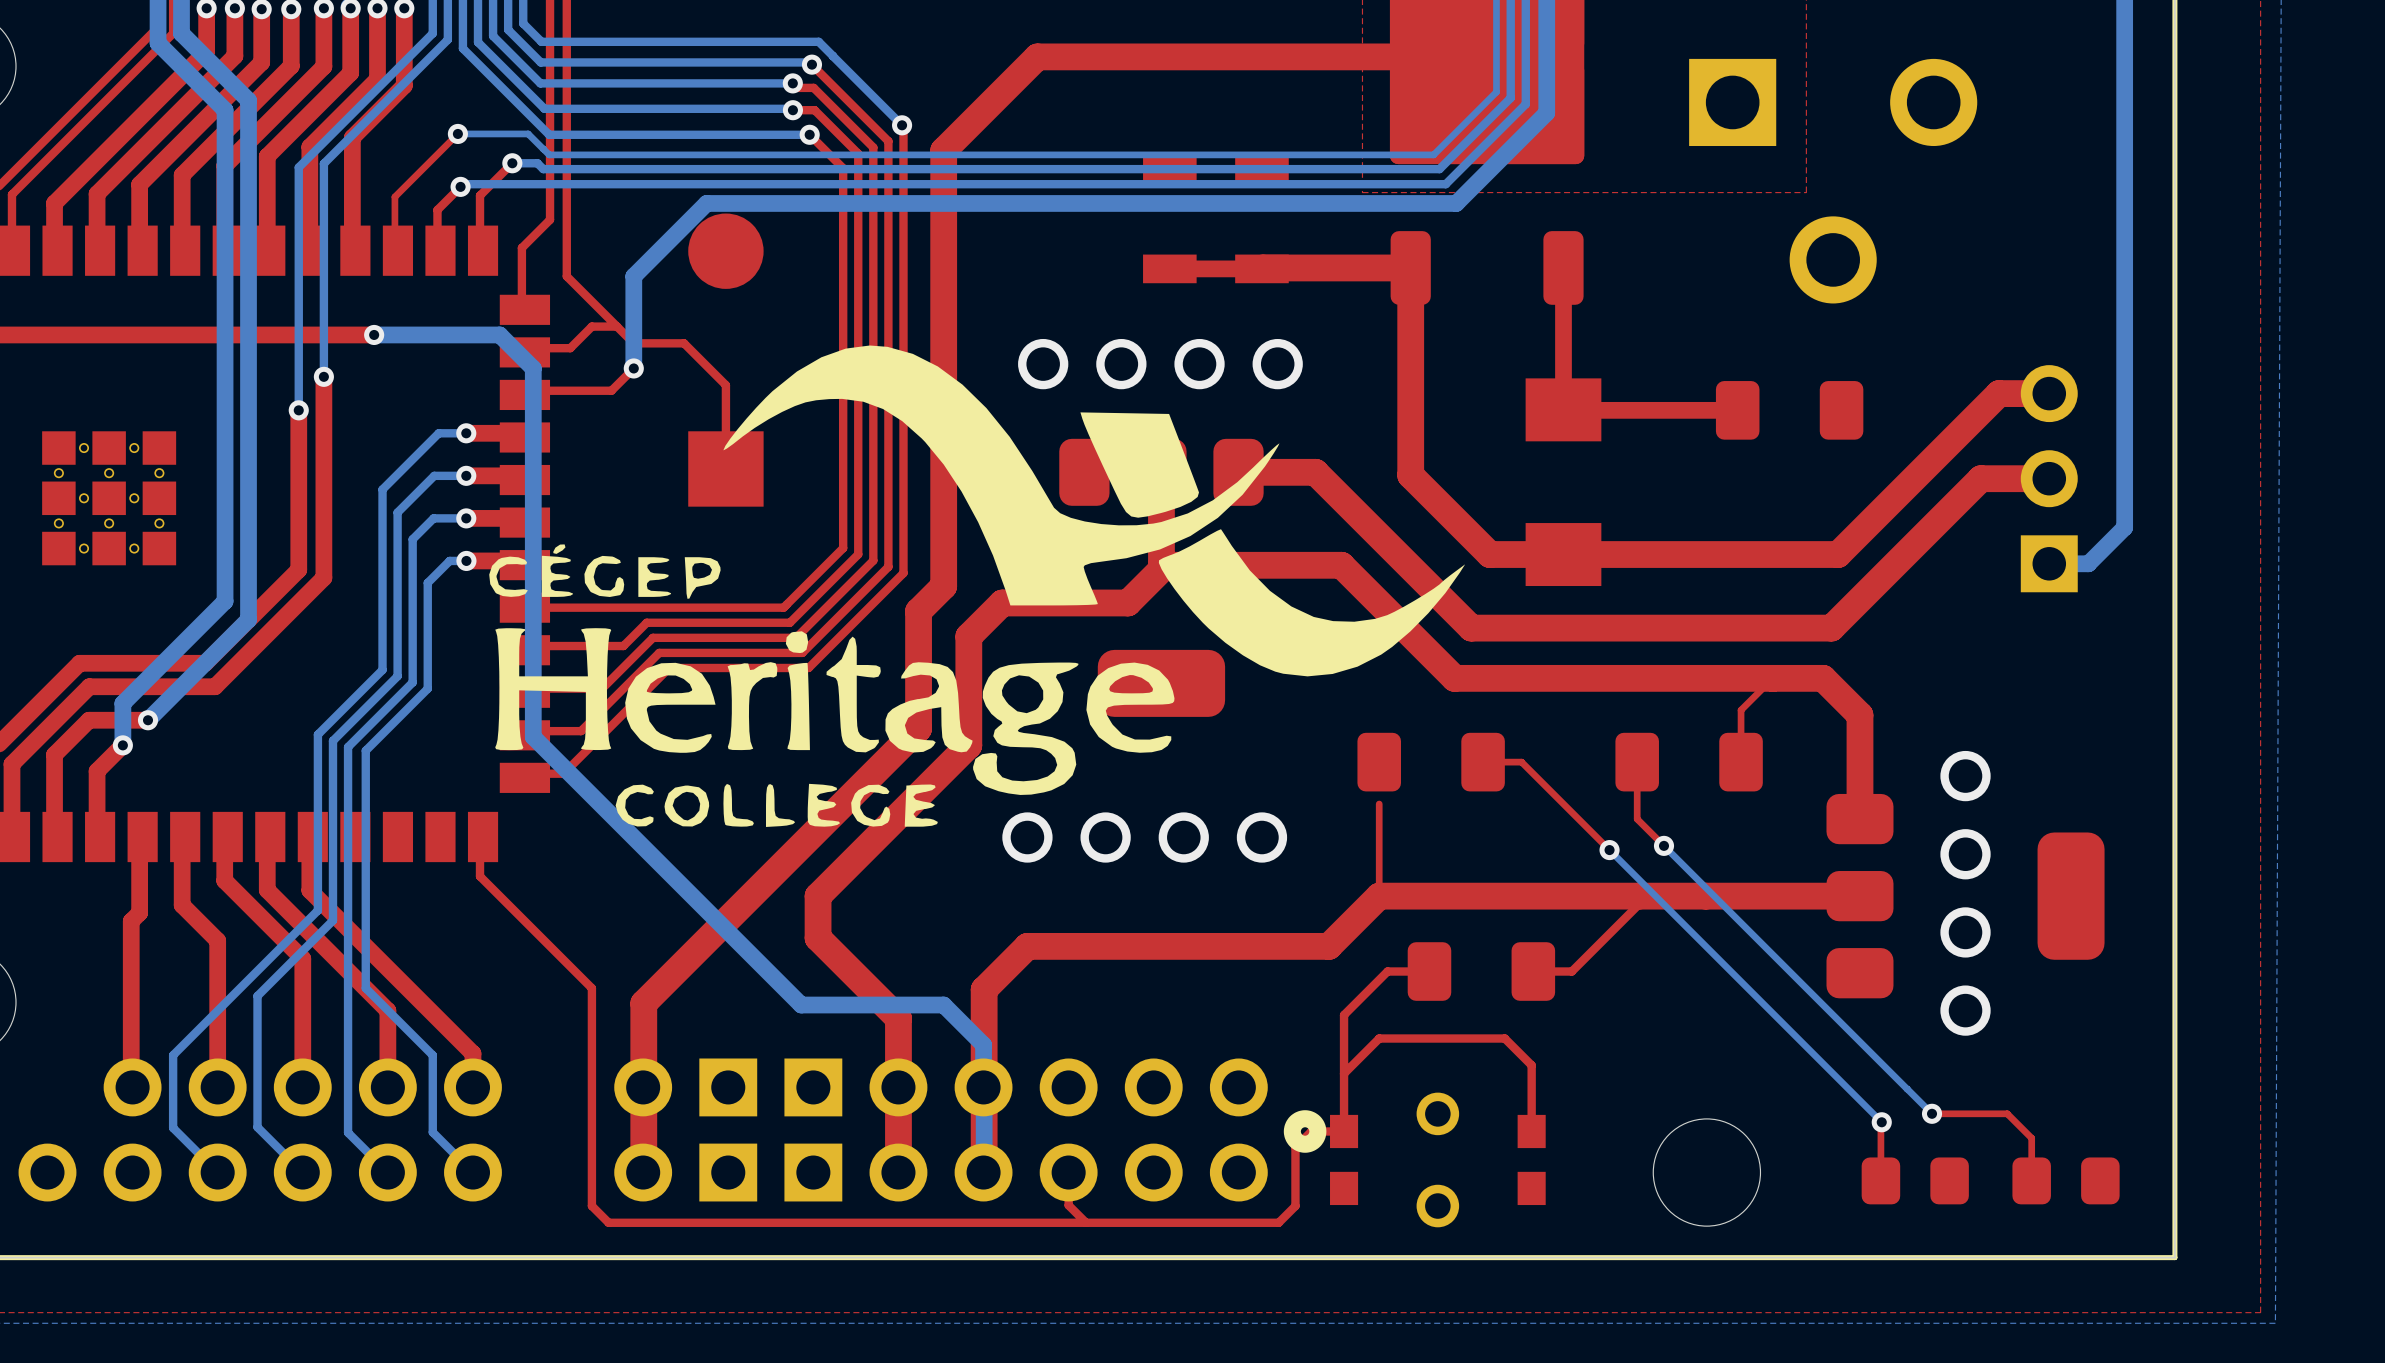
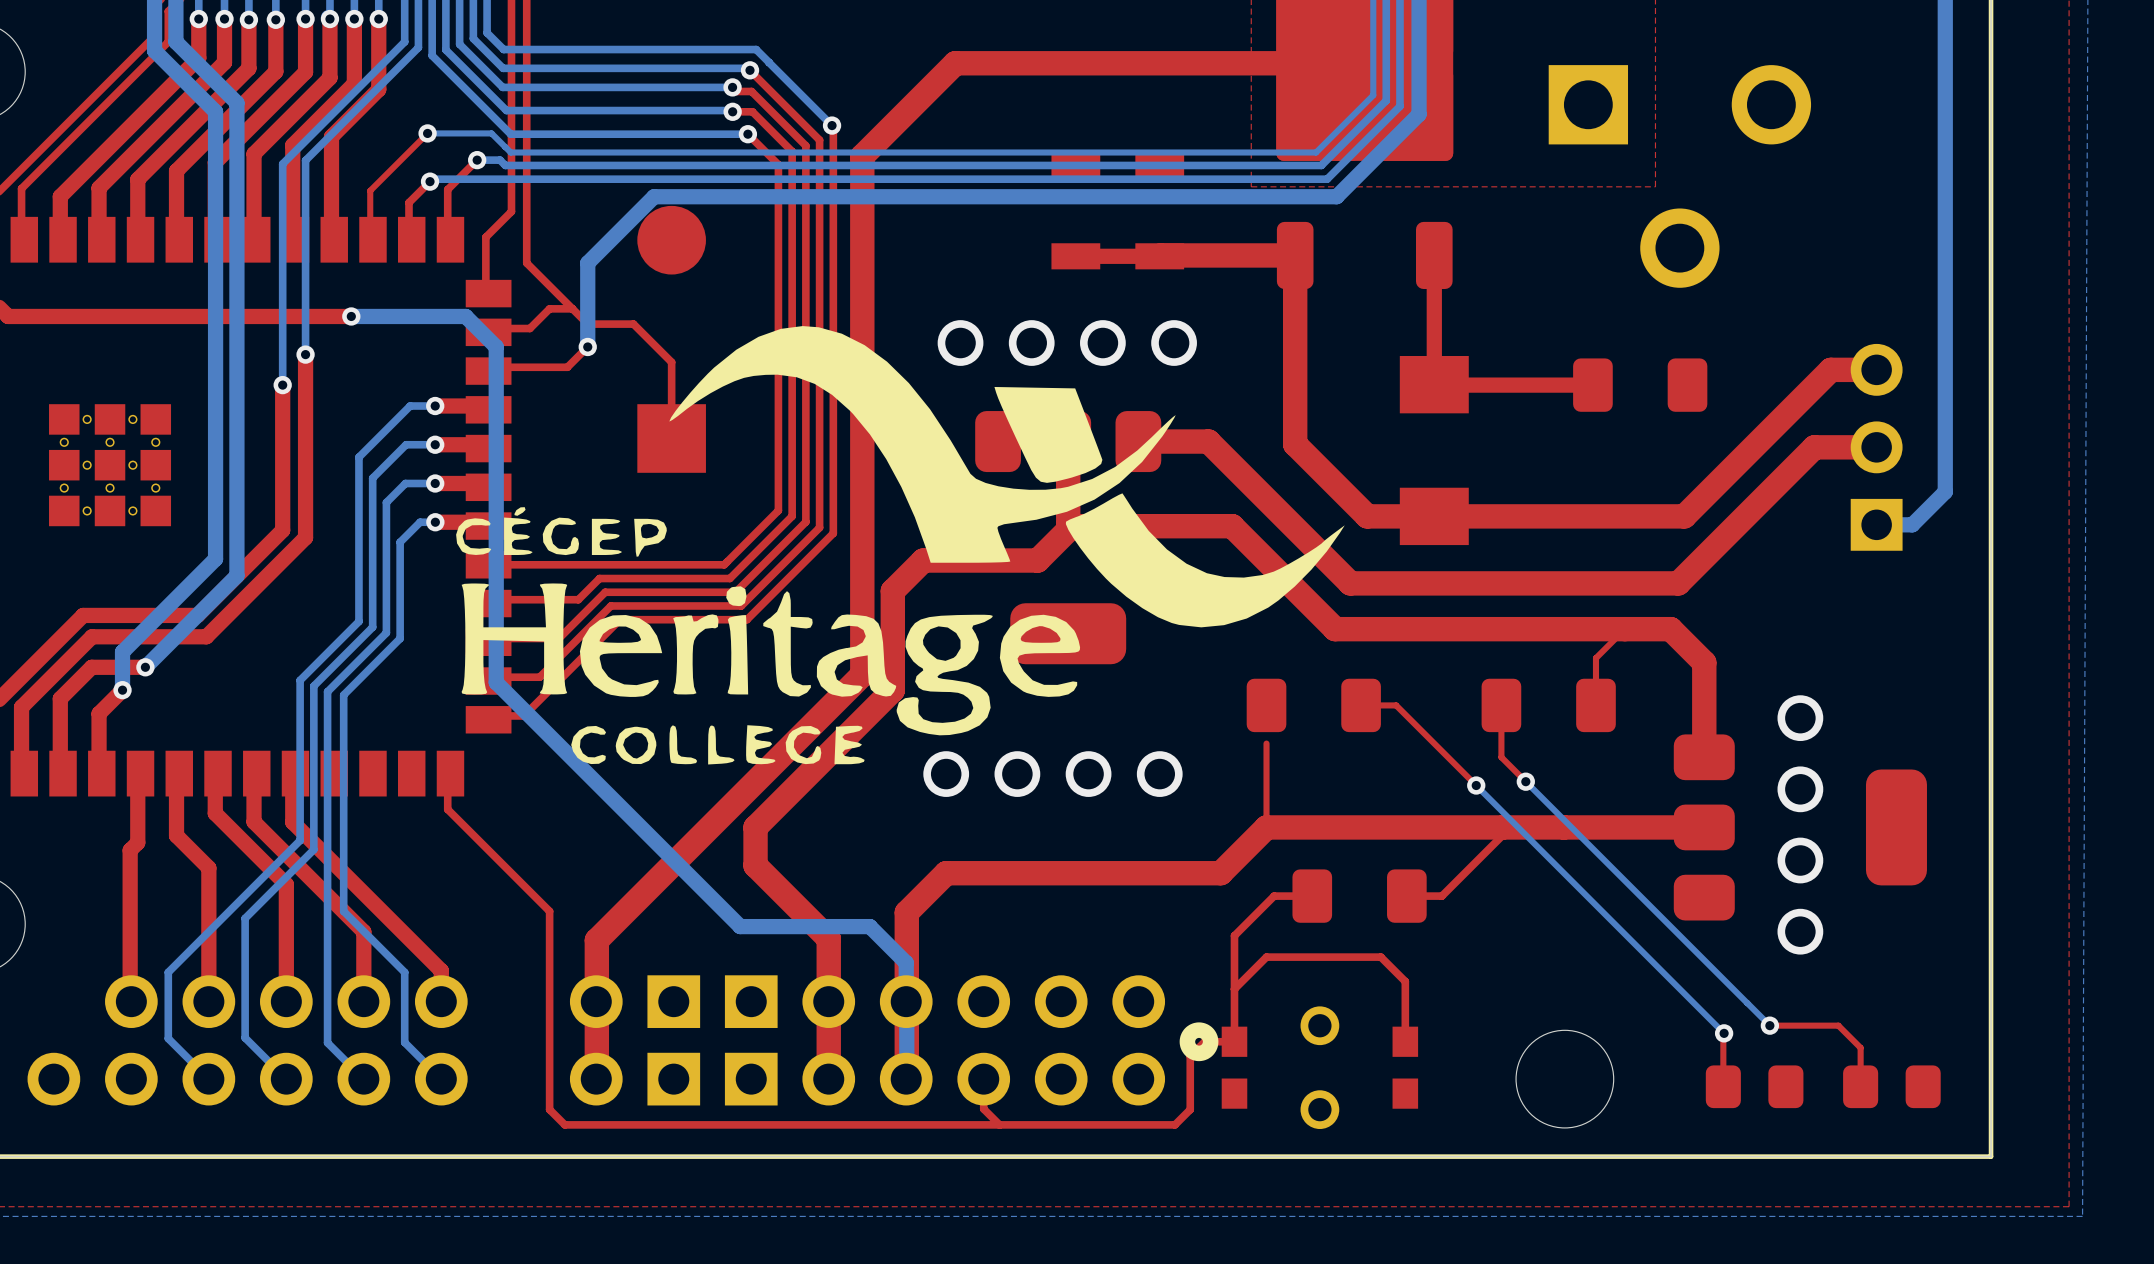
top track: (943, 150) (943, 586) (918, 611) (918, 728) (643, 1003) (643, 1020) -> (869, 148) (862, 156) (862, 674) (596, 940)

